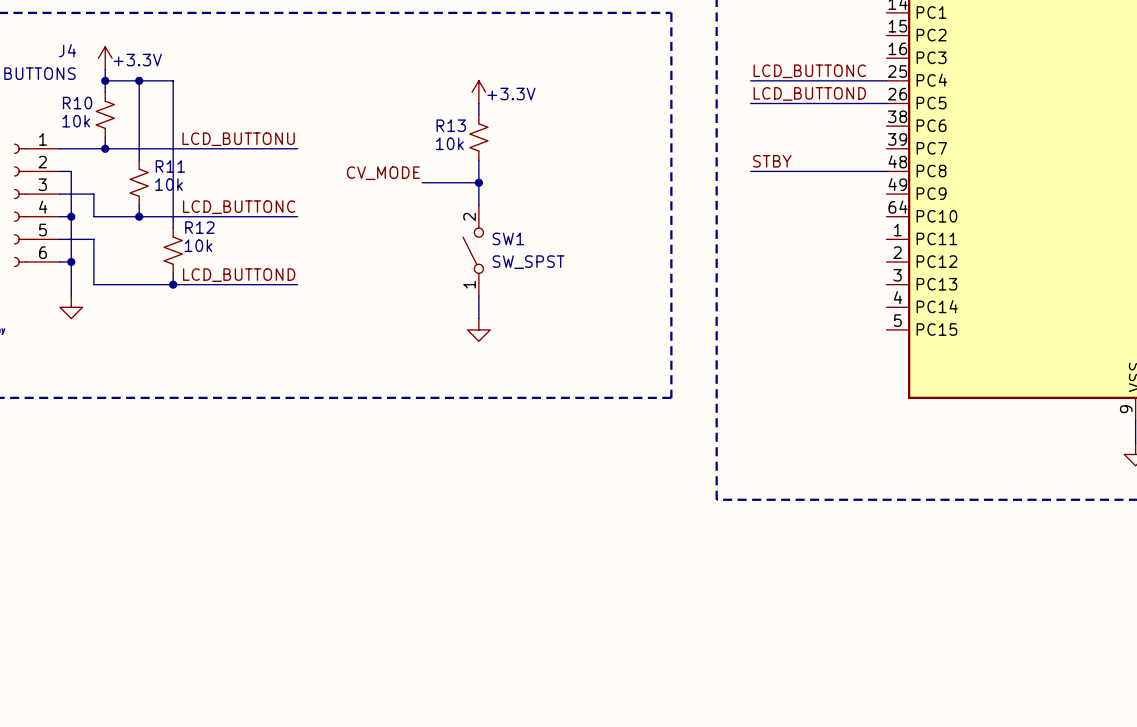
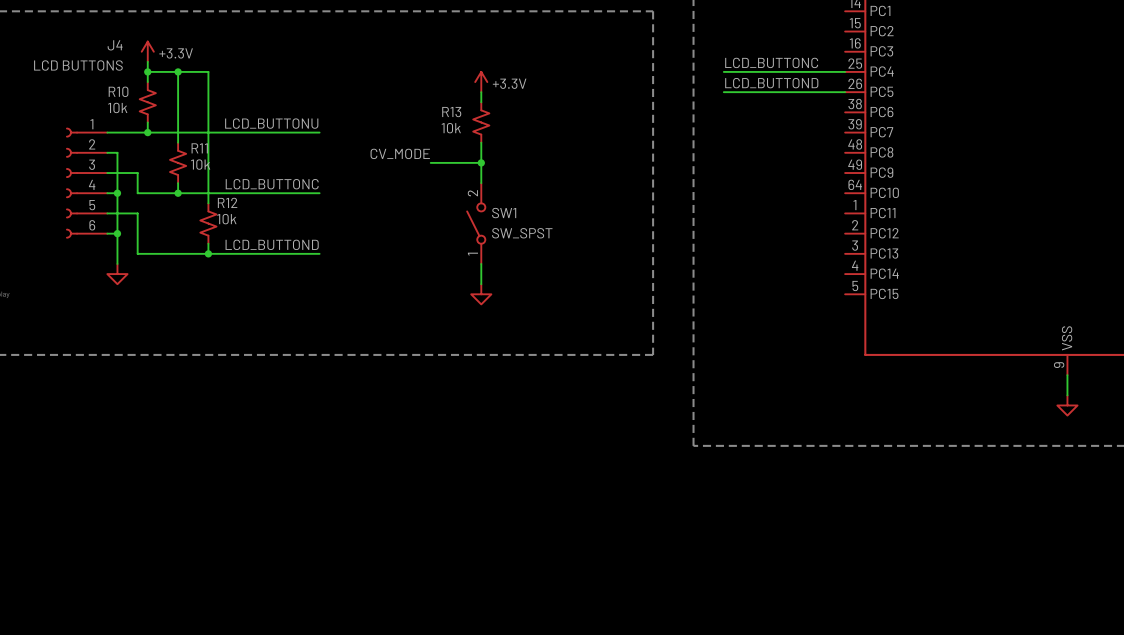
label: STBY (772, 161) -> none
wire: (750, 171) (886, 171) -> none

